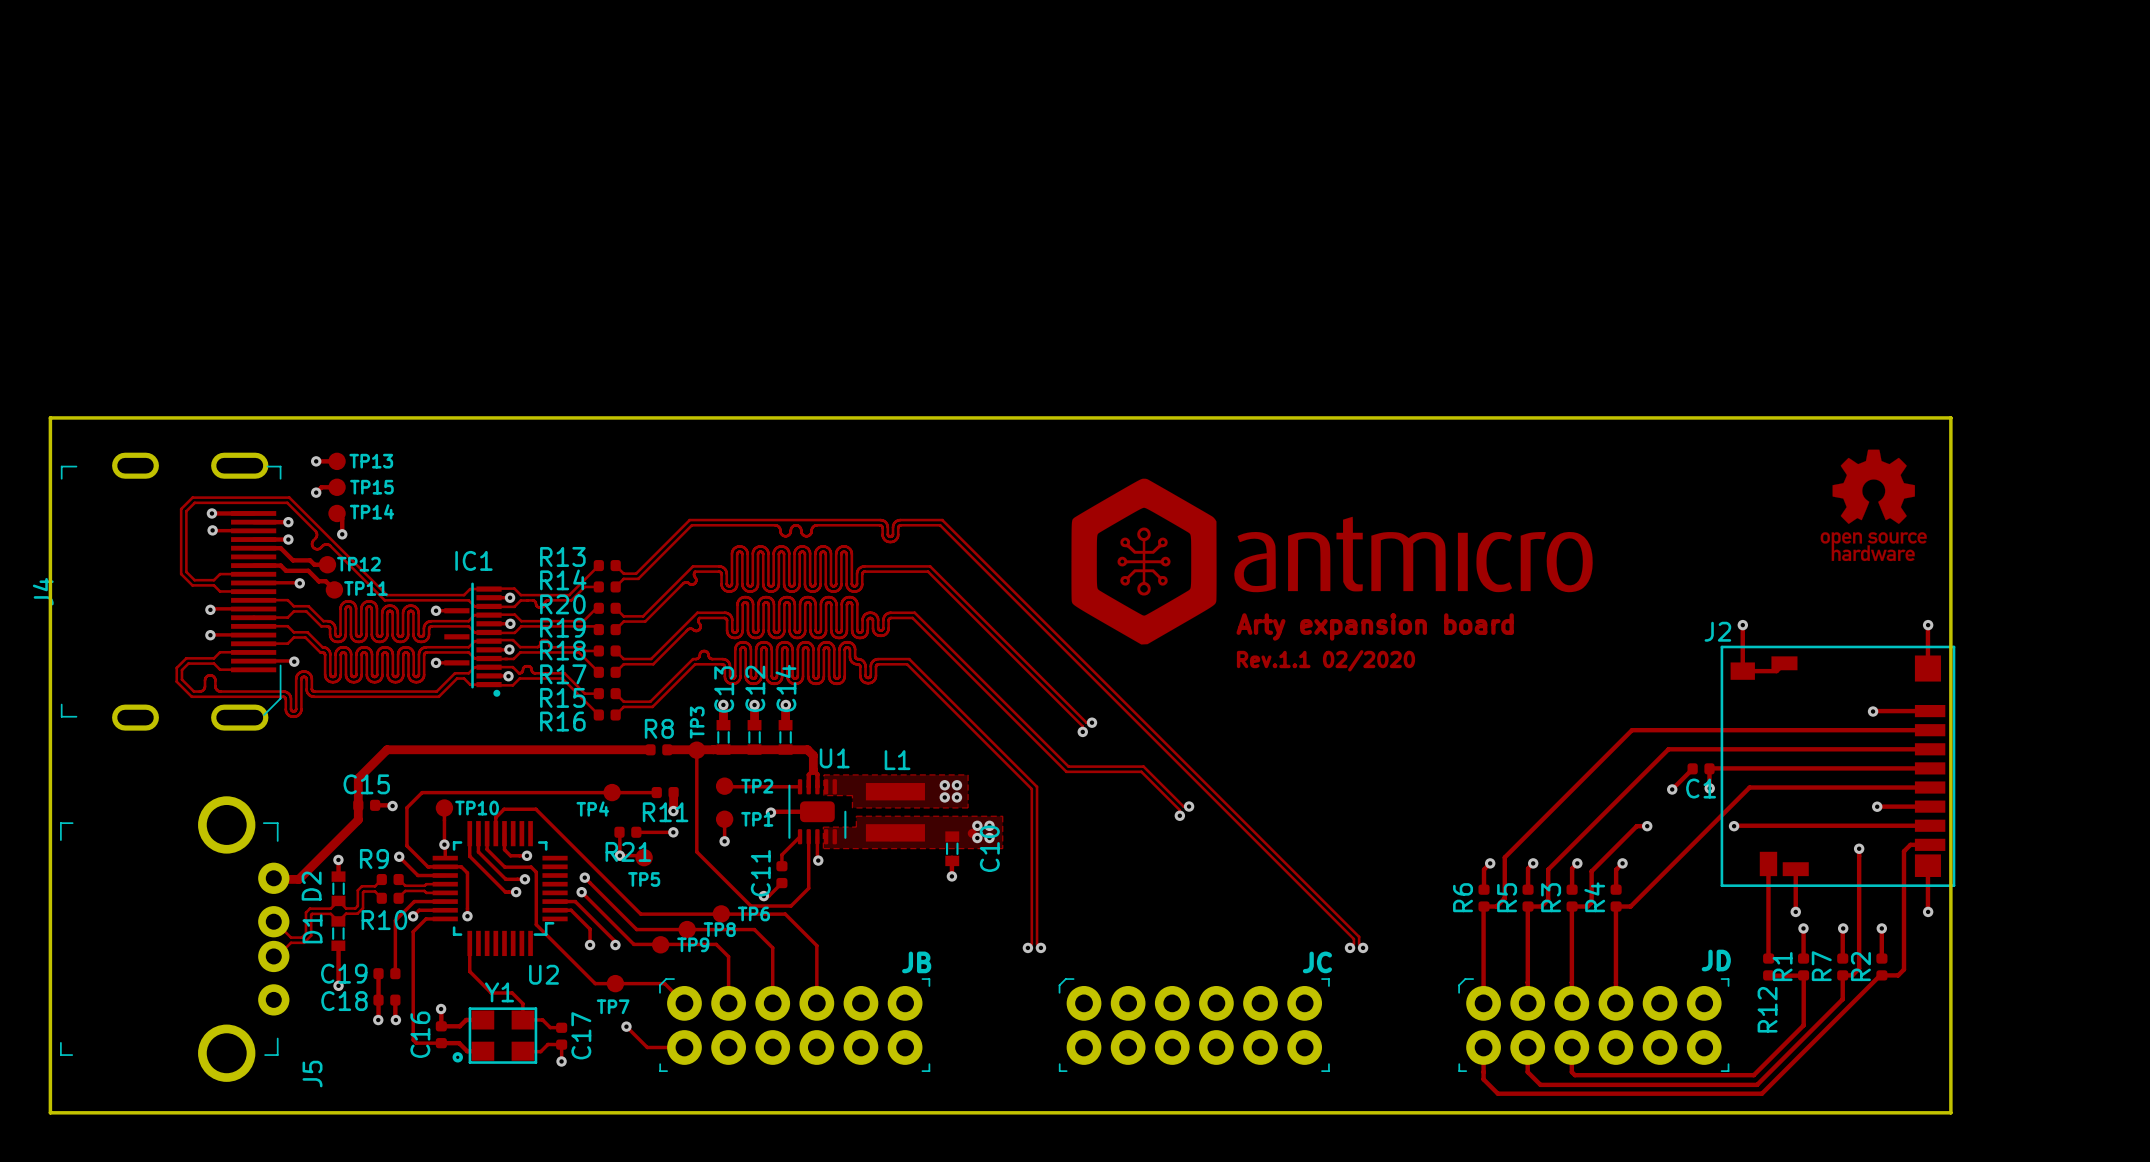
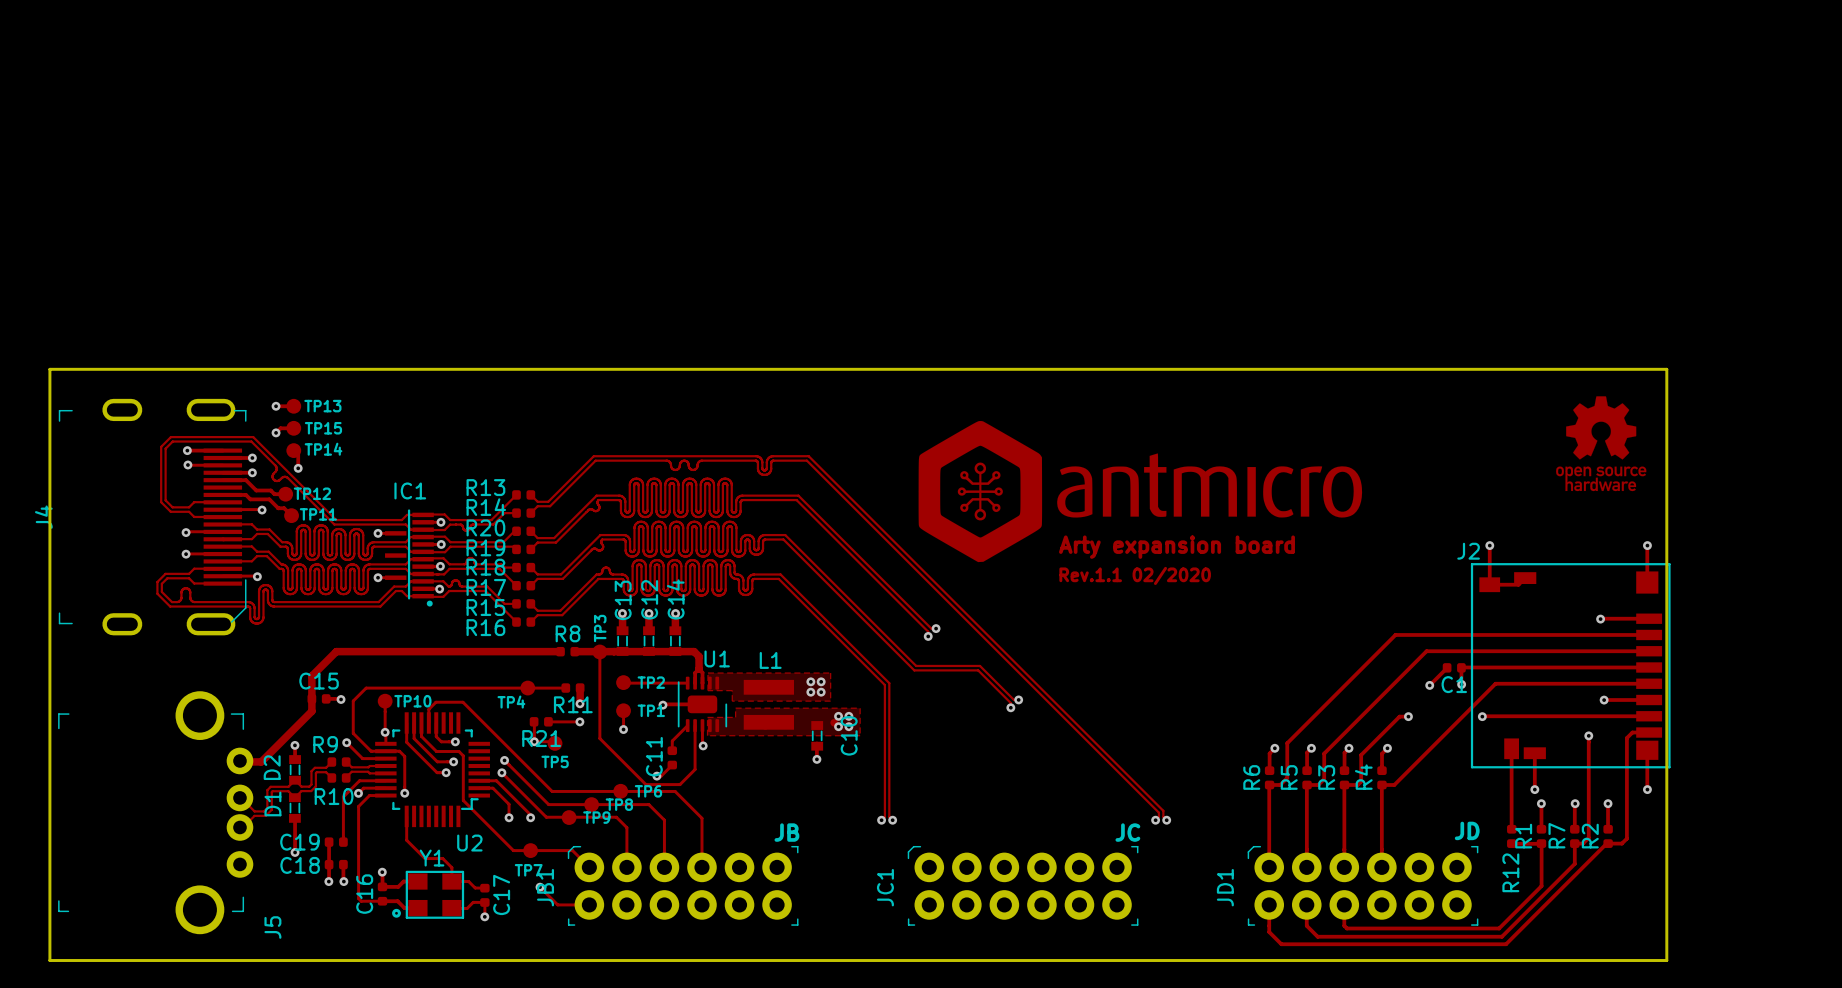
JB1 name: none -> JB1 (545, 887)
JC1 name: none -> JC1 (885, 887)
JD1 name: none -> JD1 (1225, 887)

